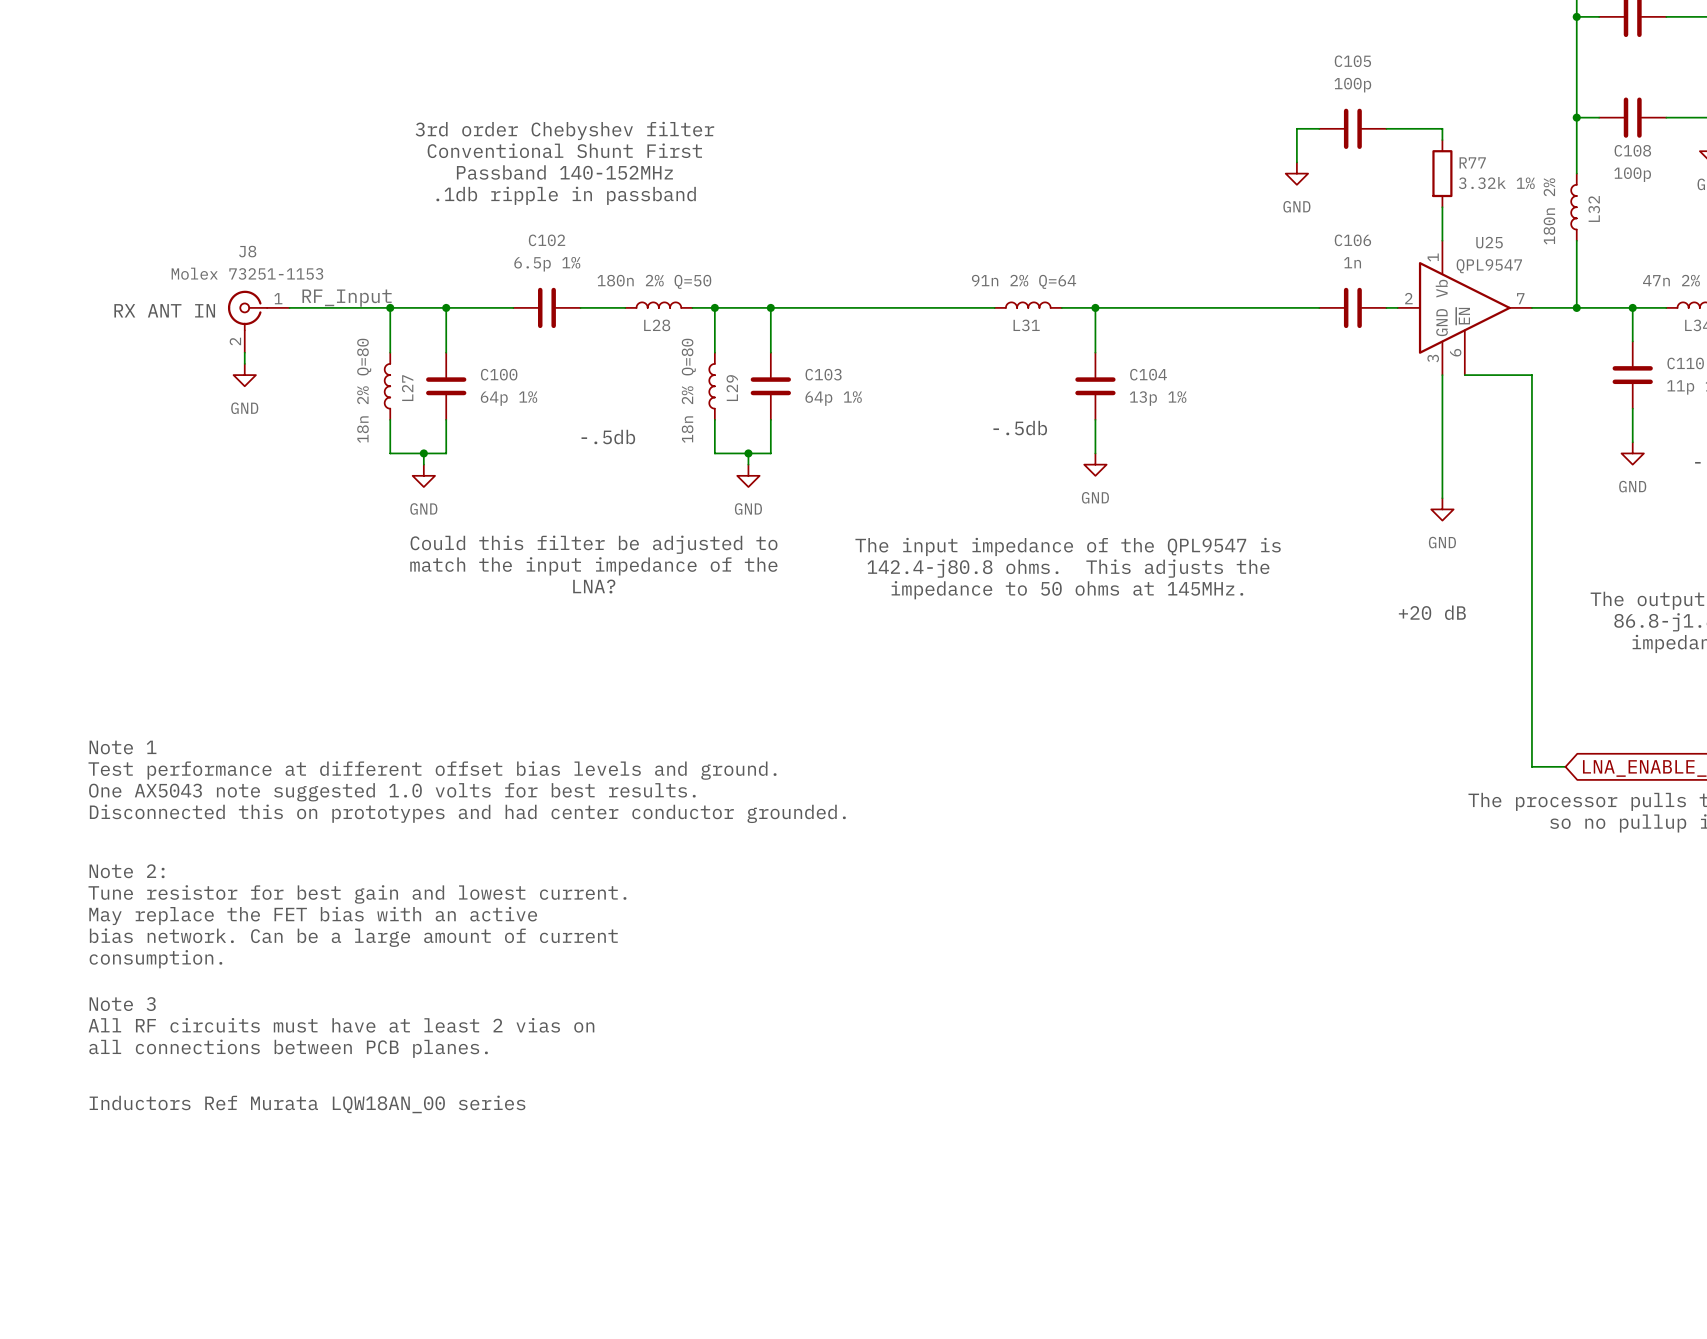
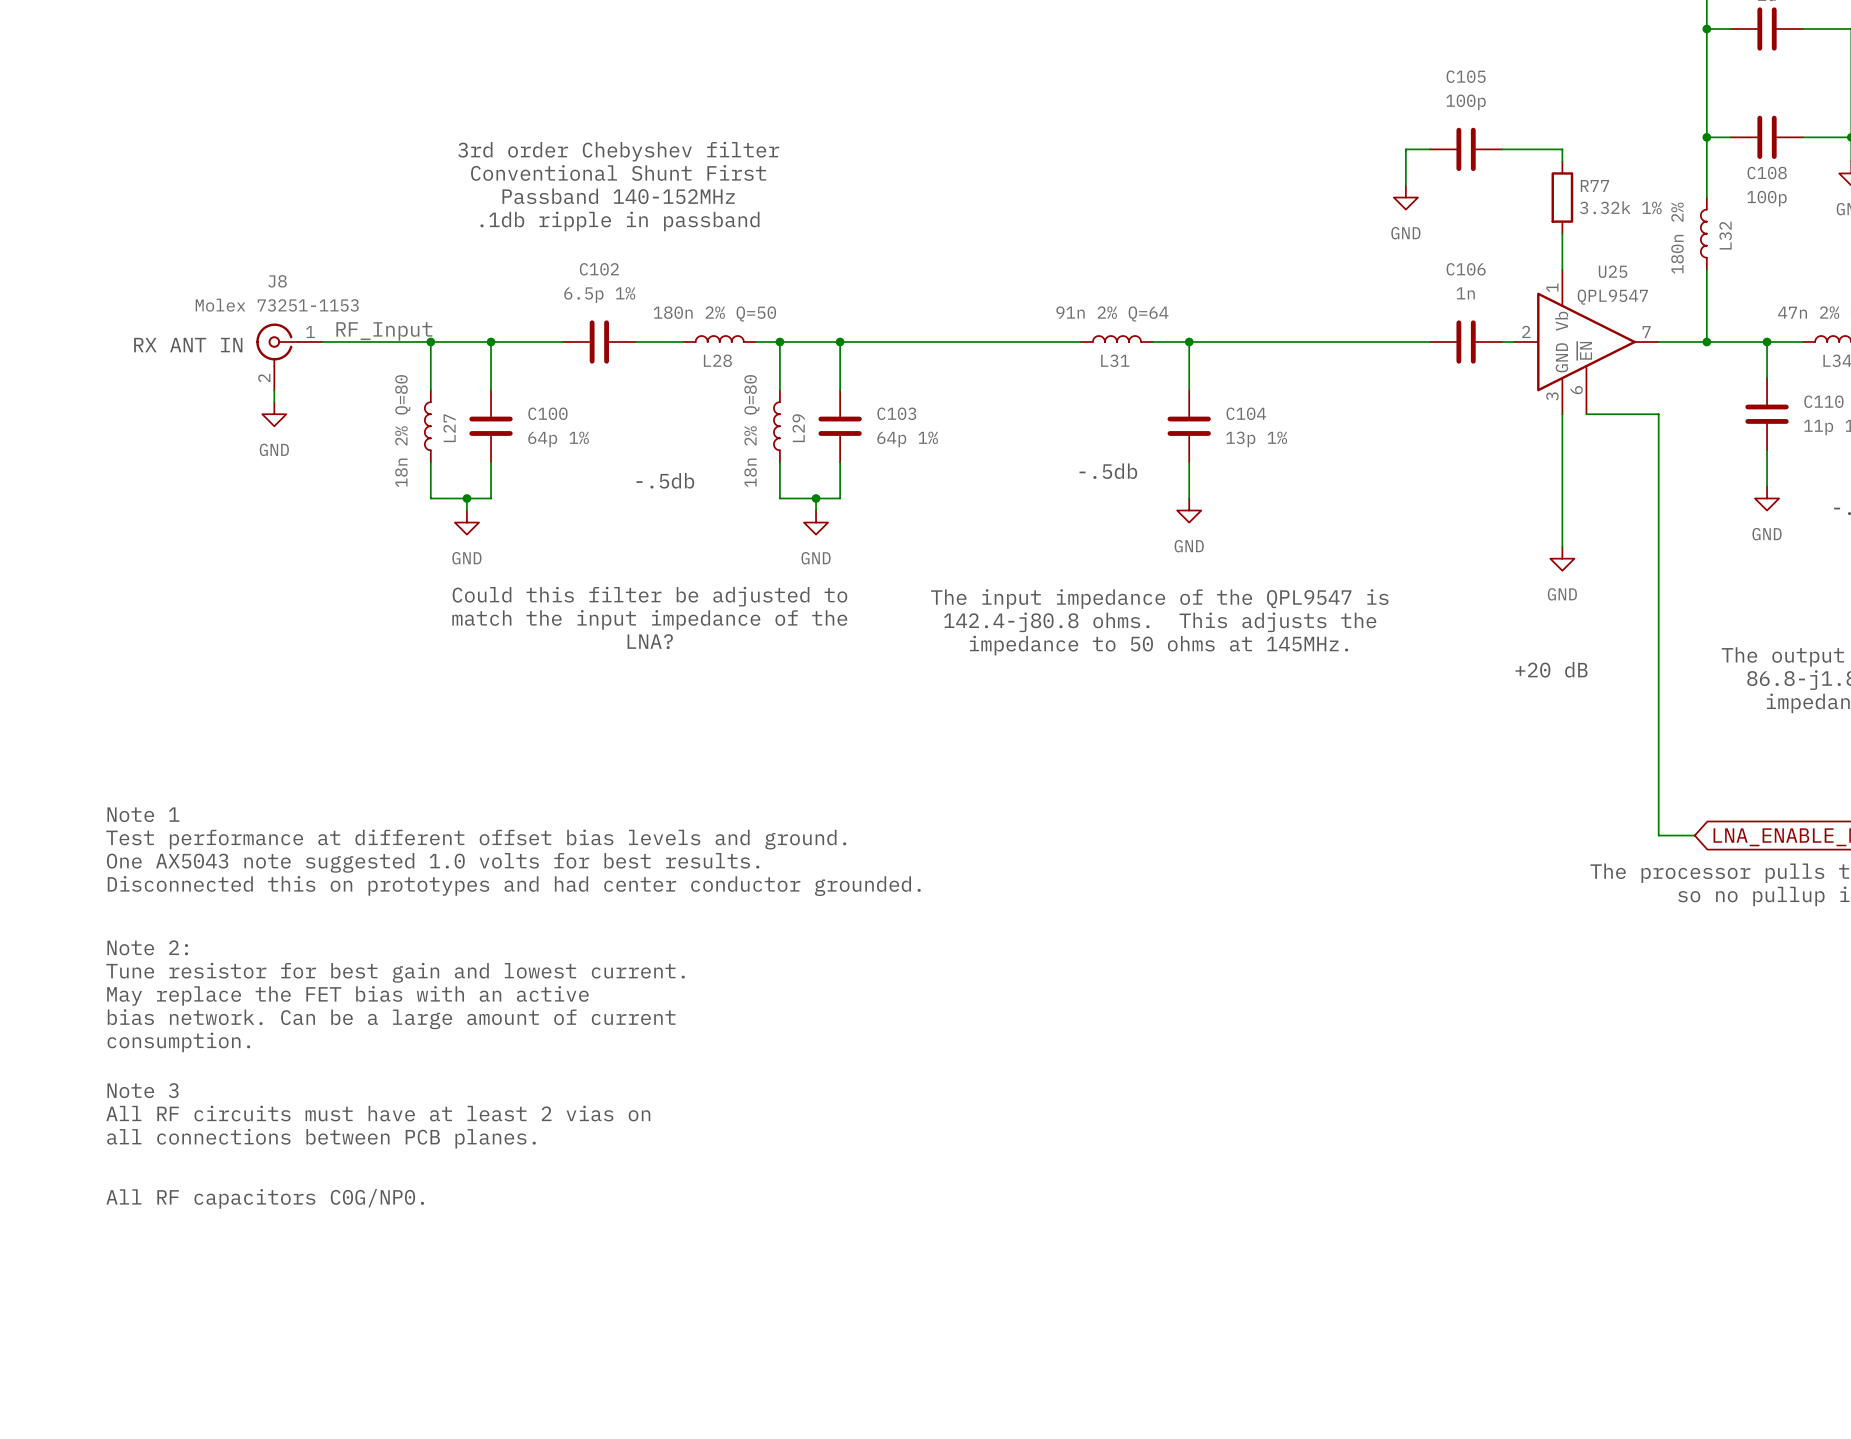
text: Inductors Ref Murata LQW18AN_00 series (307, 1104) -> All RF capacitors C0G/NP0. (265, 1198)

